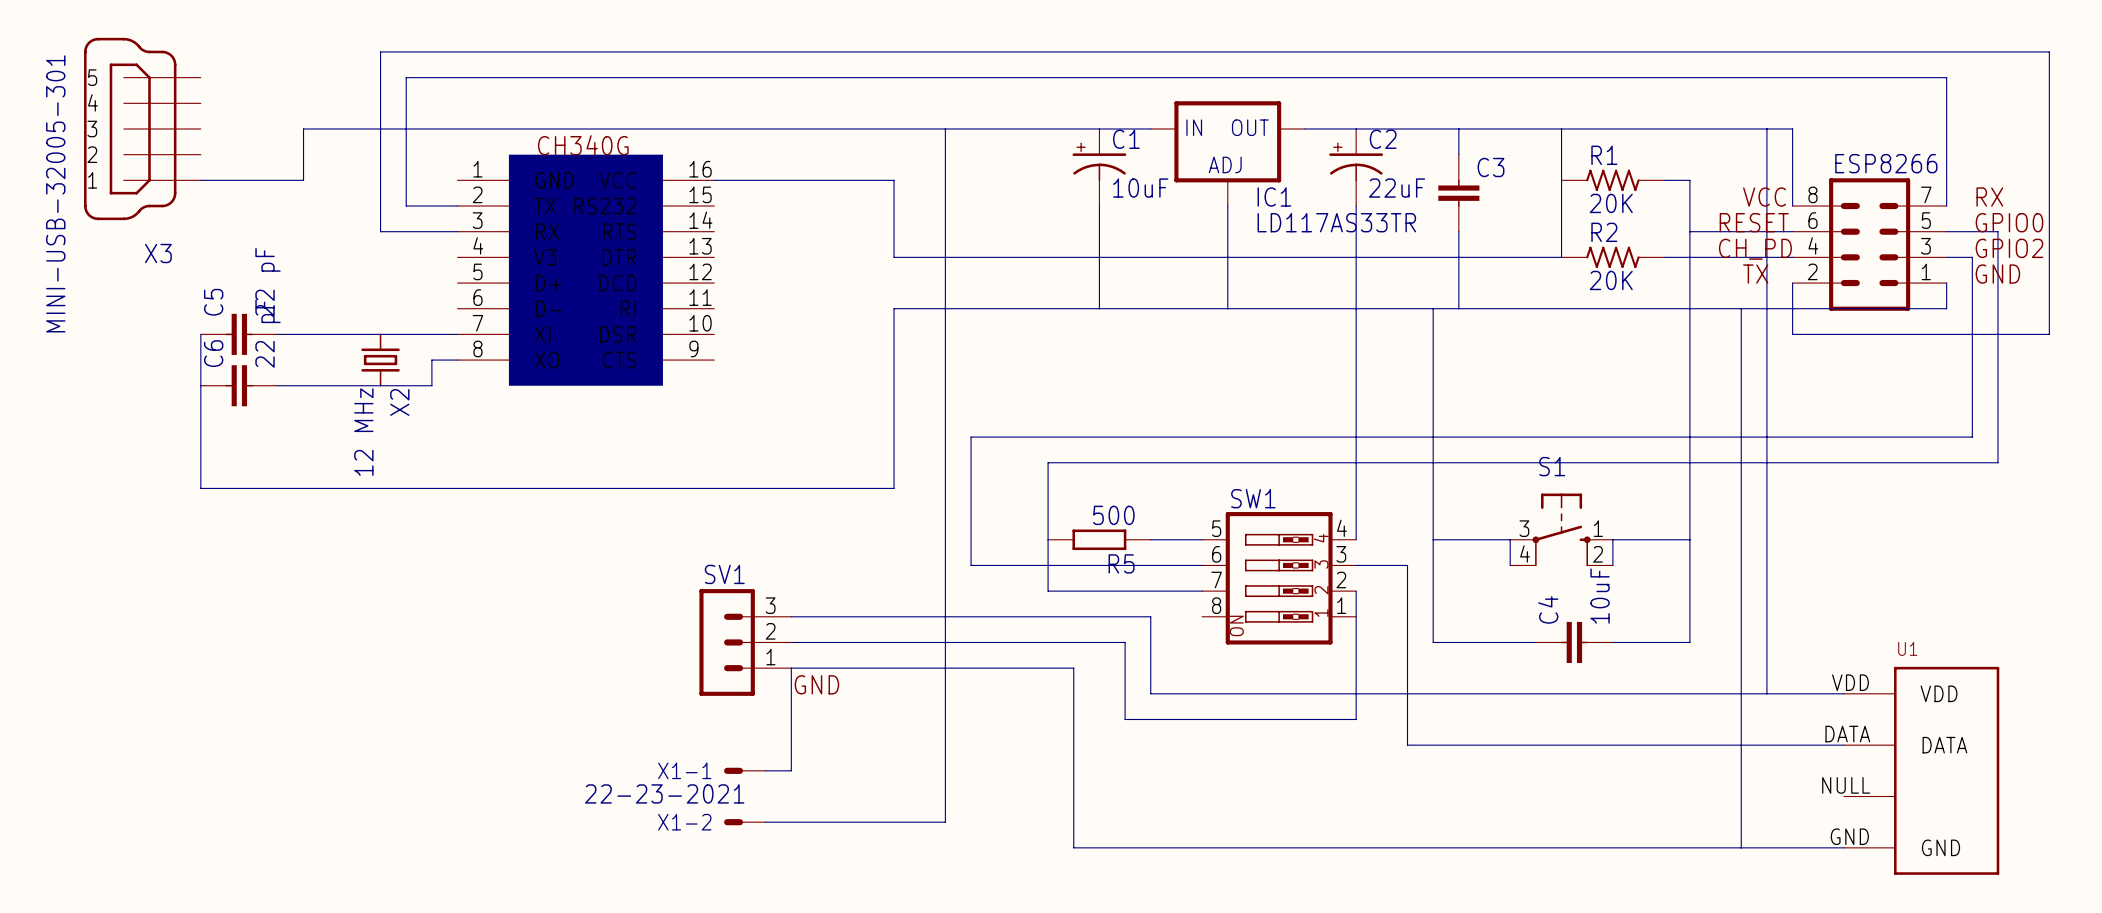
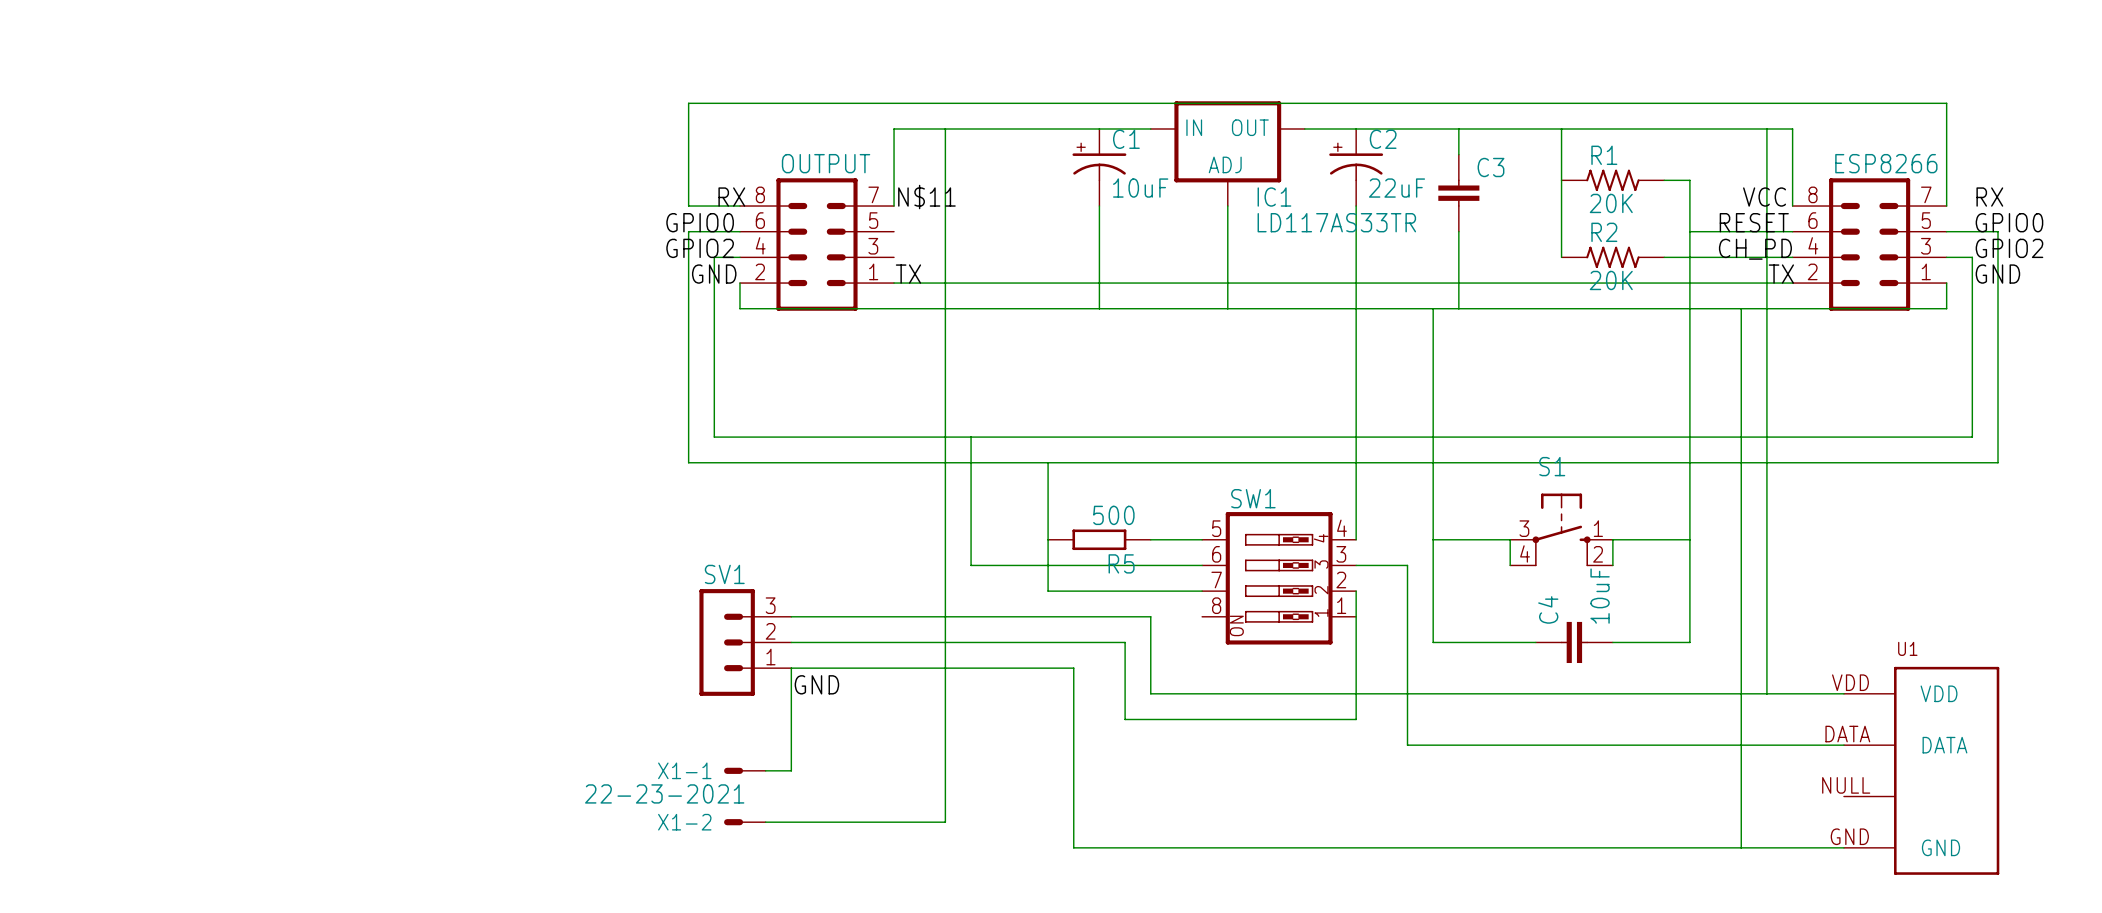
wire: (1946, 103) (1946, 77) (406, 77) (406, 206) (457, 206) -> (1946, 103) (688, 103) (688, 206) (739, 206)
X3: MINI-USB-32005-301 (142, 128) -> none
wire: (894, 128) (303, 128) (303, 180) (200, 180) -> none
wire: (714, 180) (894, 180) -> (894, 128) (894, 180)
label: none -> RX (731, 197)
label: none -> N$11 (926, 197)
wire: (894, 206) (894, 257) (1561, 257) -> none
label: none -> GPIO0 (700, 222)
wire: (457, 231) (380, 231) (380, 51) (2049, 51) (2049, 334) (1792, 334) (1792, 283) -> (894, 283) (1792, 283)
wire: none -> (739, 231) (688, 231) (688, 462) (1048, 462)
OUTPUT: none -> (817, 244)
label: none -> GPIO2 (700, 248)
wire: none -> (739, 257) (714, 257) (714, 437) (971, 437)
part: (585, 270) -> none
label: none -> GND (714, 274)
label: none -> TX (908, 274)
label position: TX (1755, 274) -> TX (1781, 274)
wire: (894, 308) (894, 488) (200, 488) (200, 334) -> (894, 308) (739, 308) (739, 283)
C5: 22 pF (239, 334) -> none
wire: (277, 334) (457, 334) -> none
X2: 12 MHz (380, 360) -> none
wire: (457, 360) (431, 360) (431, 385) (277, 385) -> none
C6: 22 pF (239, 385) -> none

